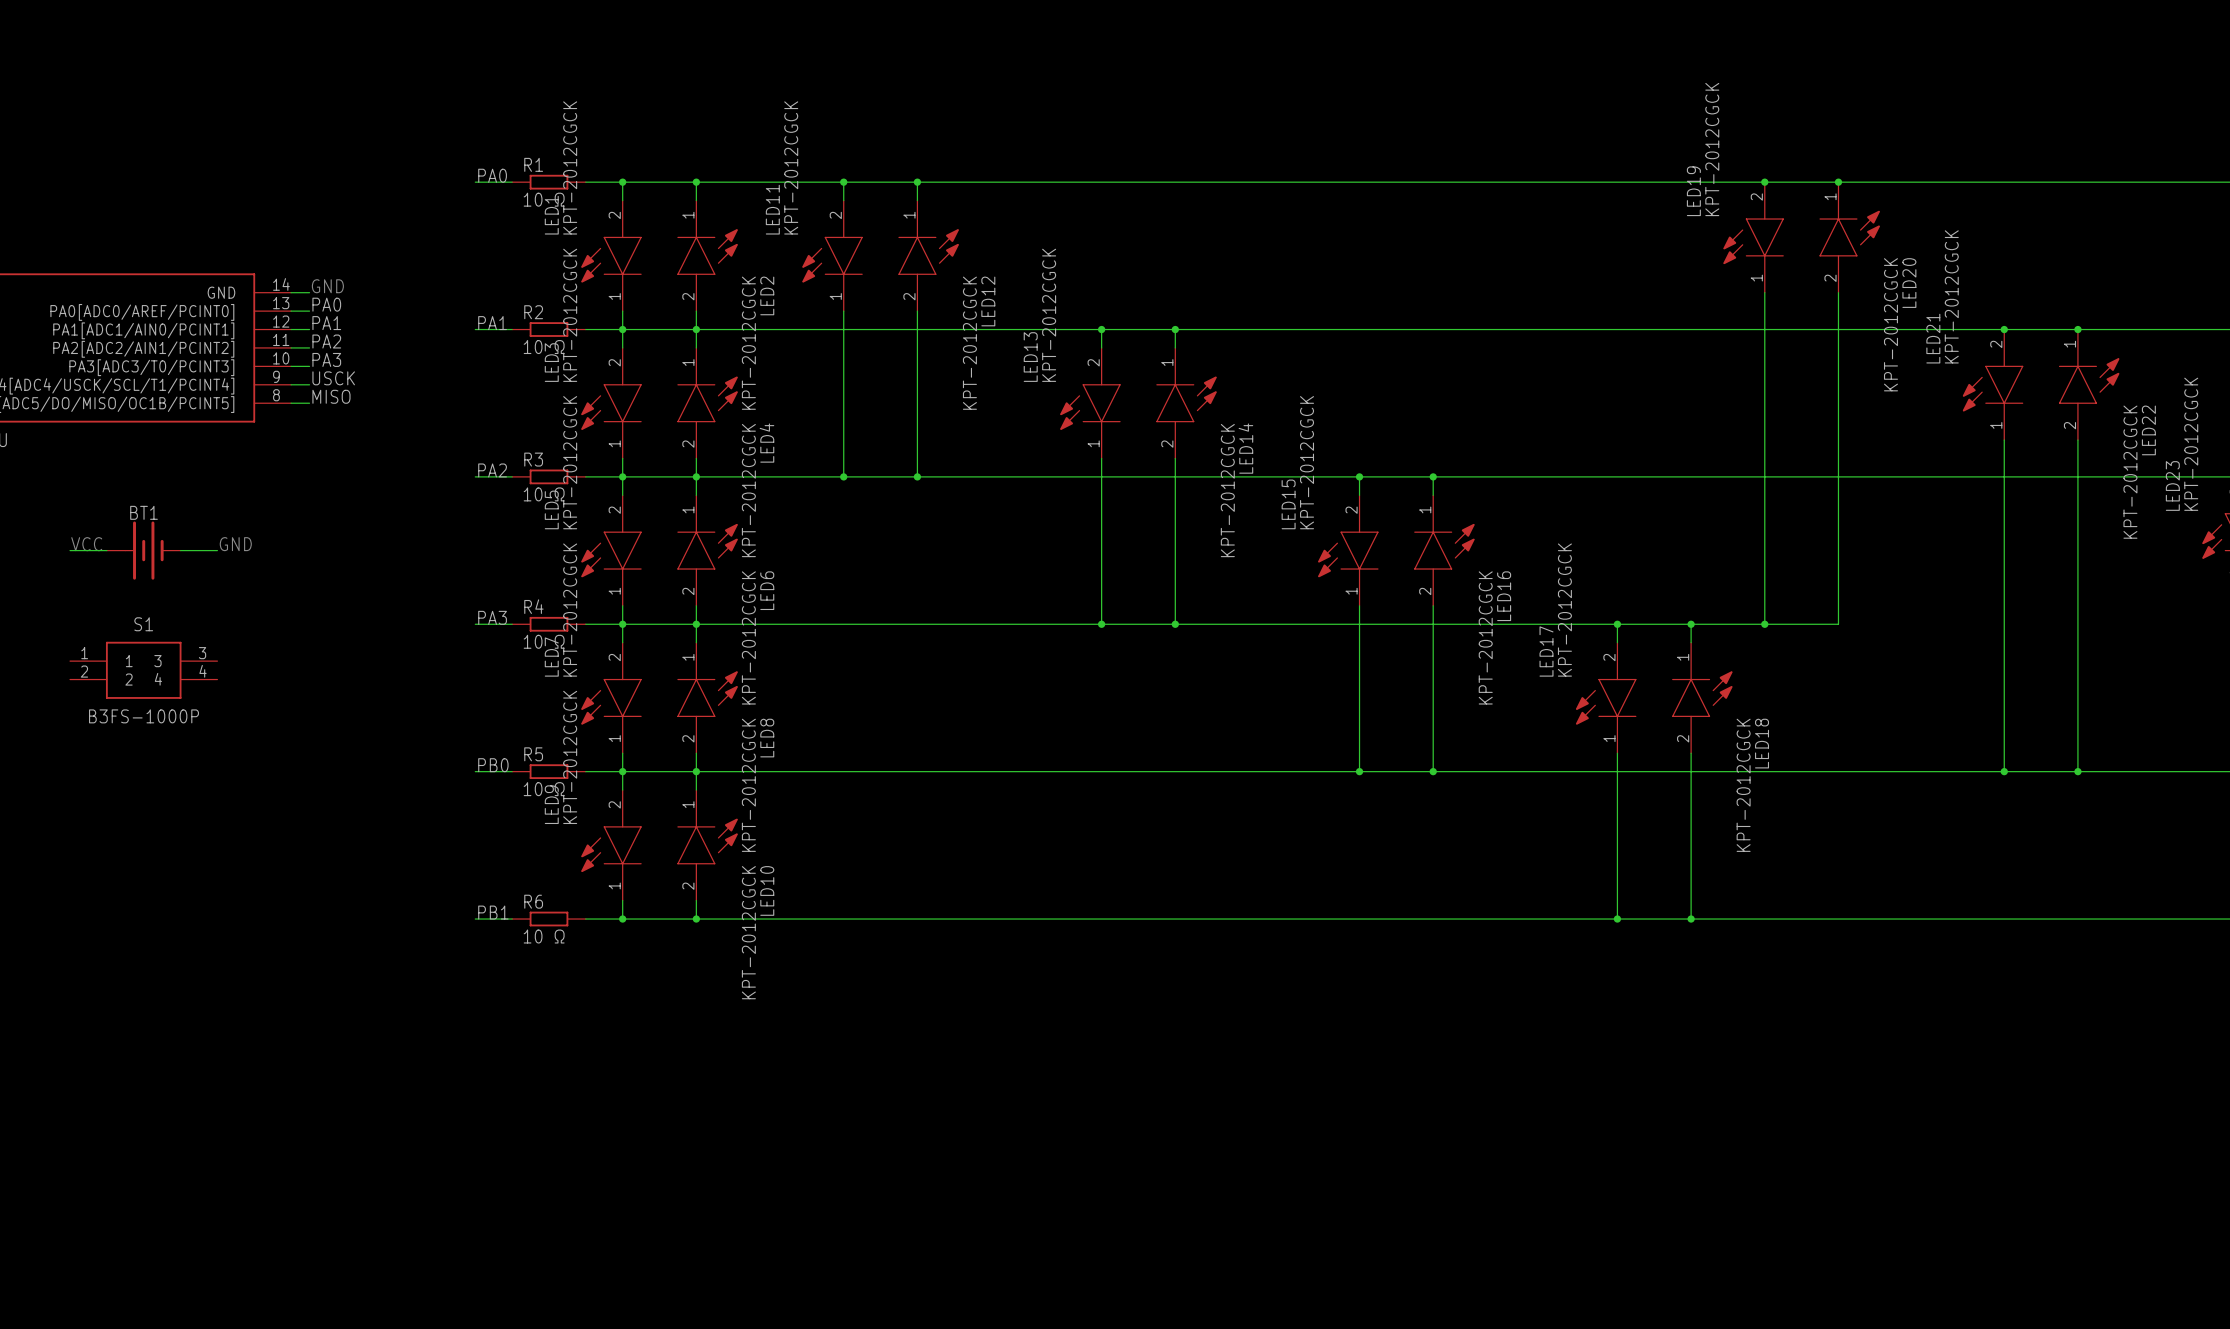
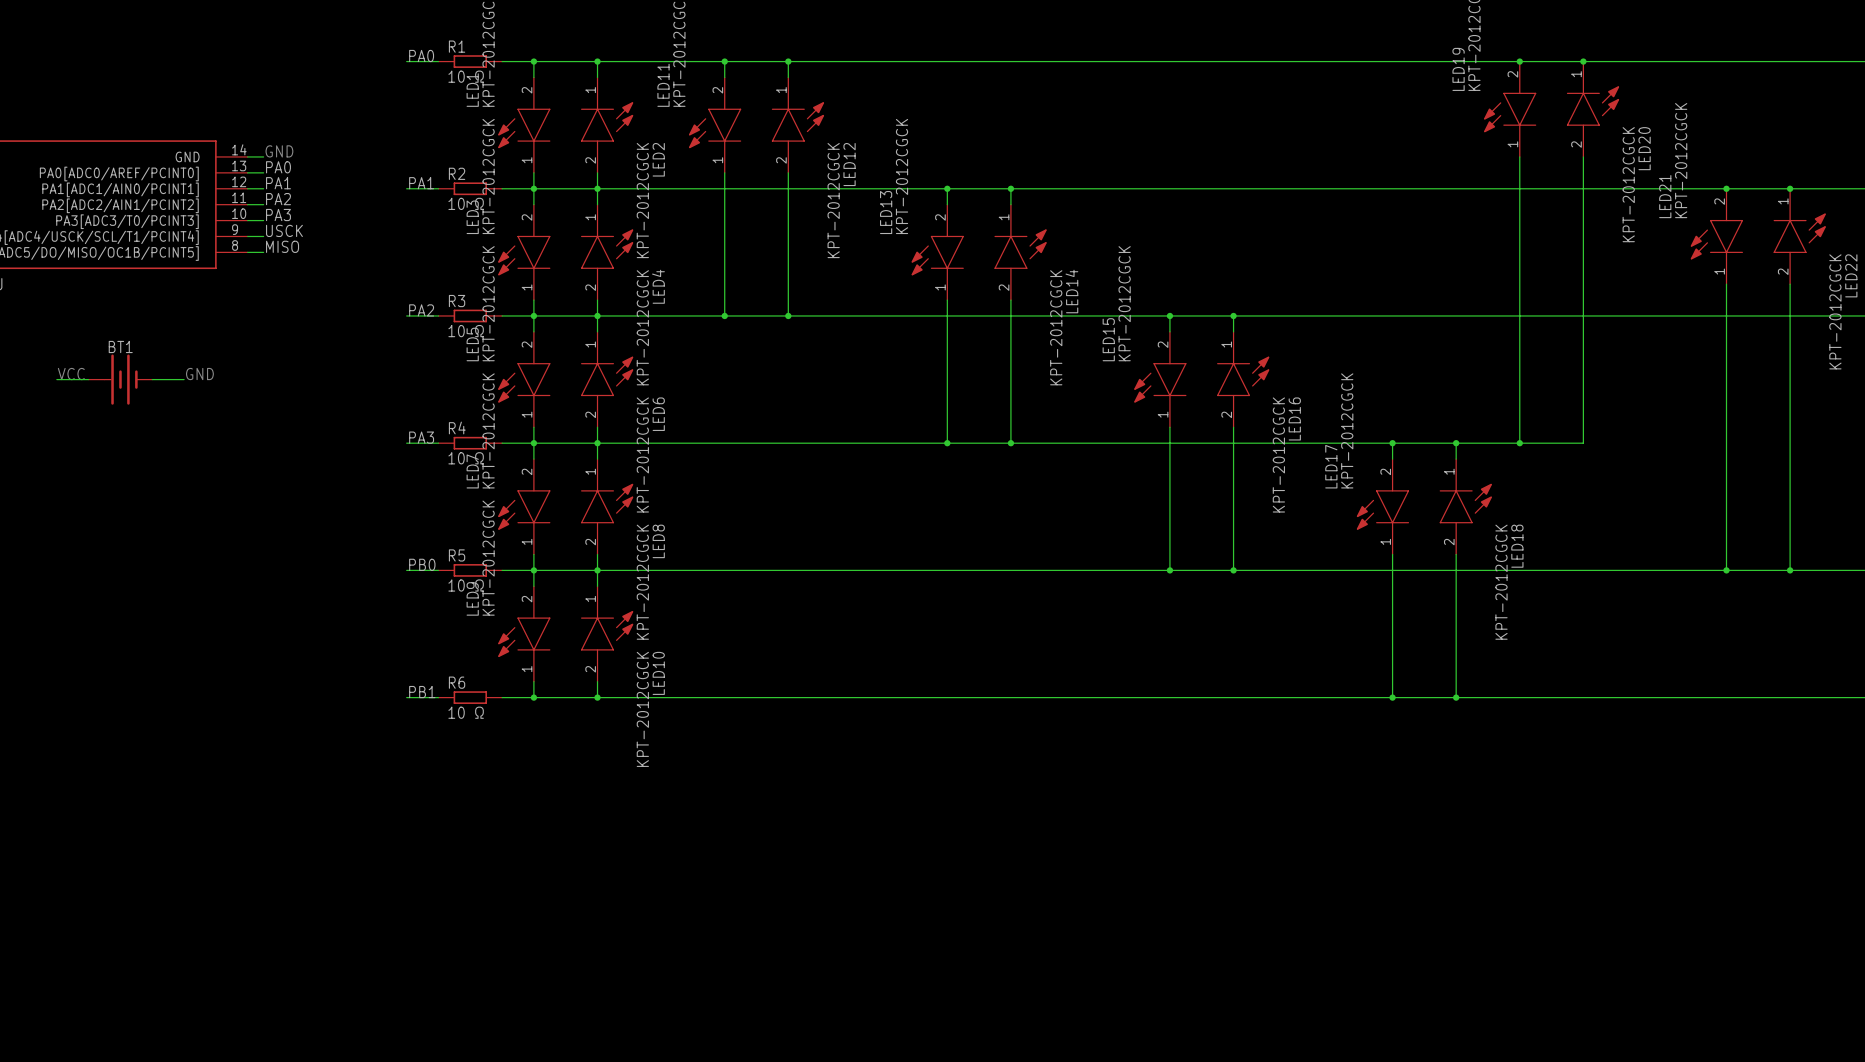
S1: B3FS-1000P (143, 670) -> none

